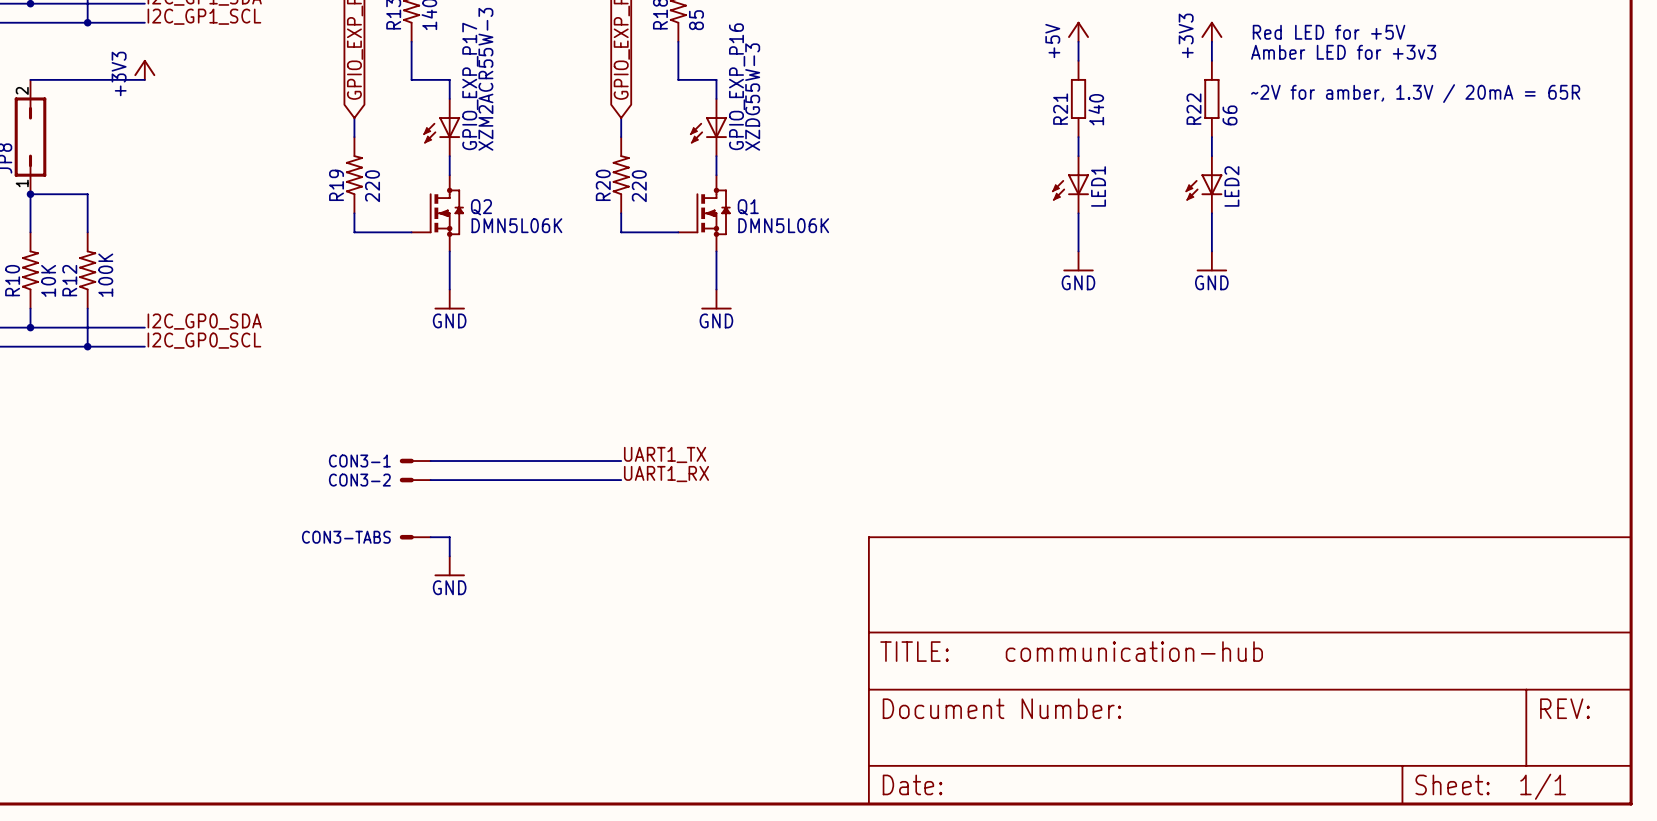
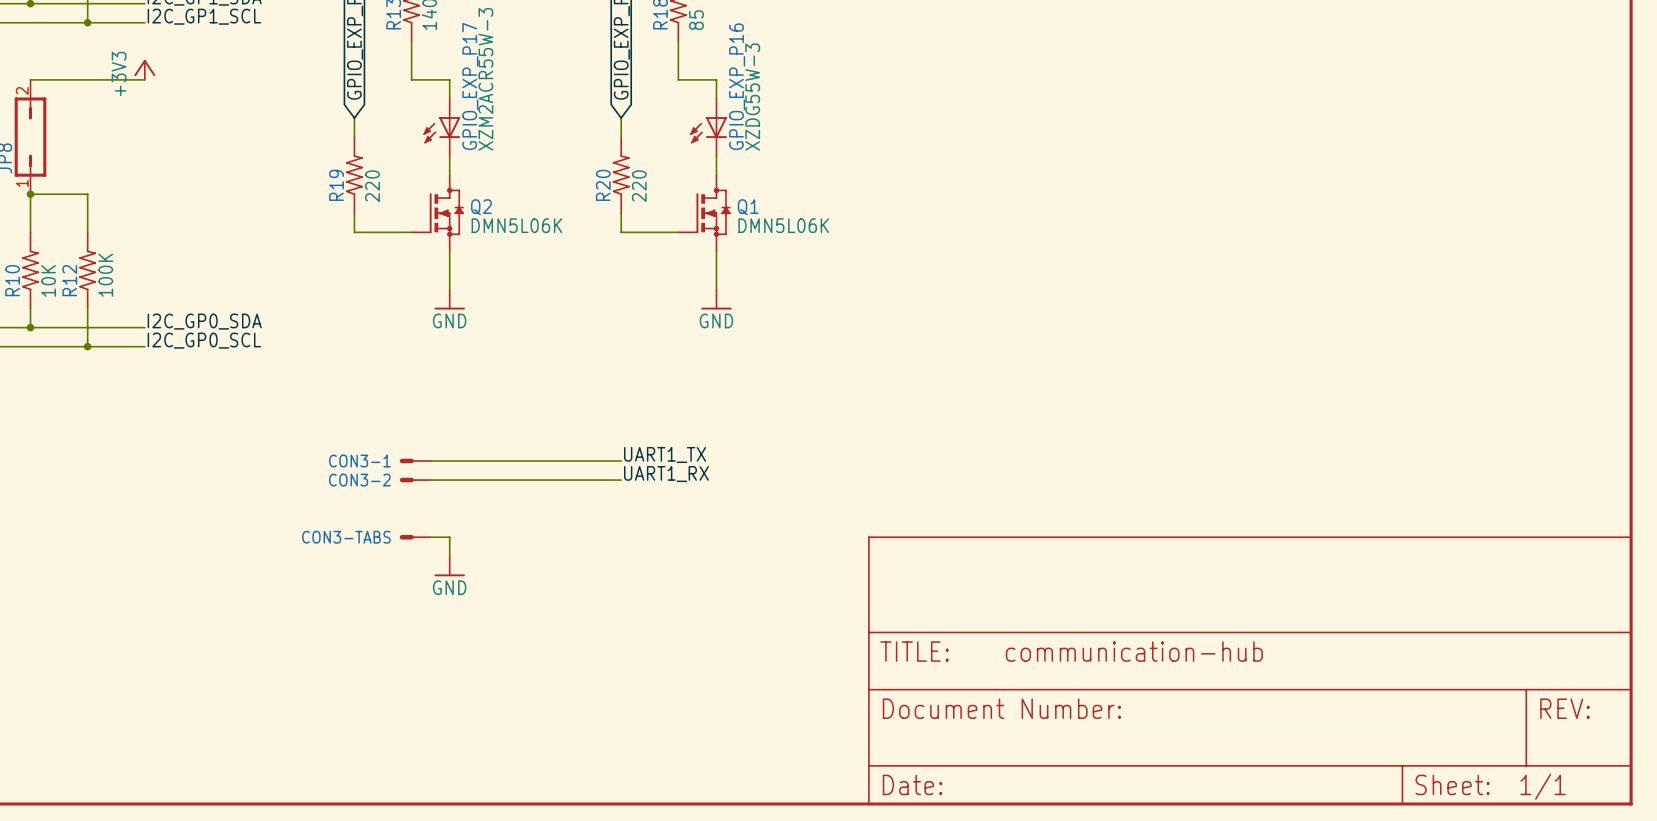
power symbol: +5V (1078, 31) -> none
power symbol: +3V3 (1211, 31) -> none
text: Red LED for +5V (1329, 32) -> none
wire: (1078, 41) (1078, 60) -> none
wire: (1211, 41) (1211, 60) -> none
text: Amber LED for +3v3 (1343, 52) -> none
text: ~2V for amber, 1.3V / 20mA = 65R (1415, 93) -> none
R21: 140 (1078, 98) -> none
R22: 66 (1211, 98) -> none
wire: (1078, 137) (1078, 156) -> none
wire: (1211, 137) (1211, 156) -> none
LED1: (1070, 184) -> none
LED2: (1203, 184) -> none
wire: (1078, 213) (1078, 251) -> none
wire: (1211, 213) (1211, 251) -> none
power symbol: GND (1078, 261) -> none
power symbol: GND (1211, 261) -> none

